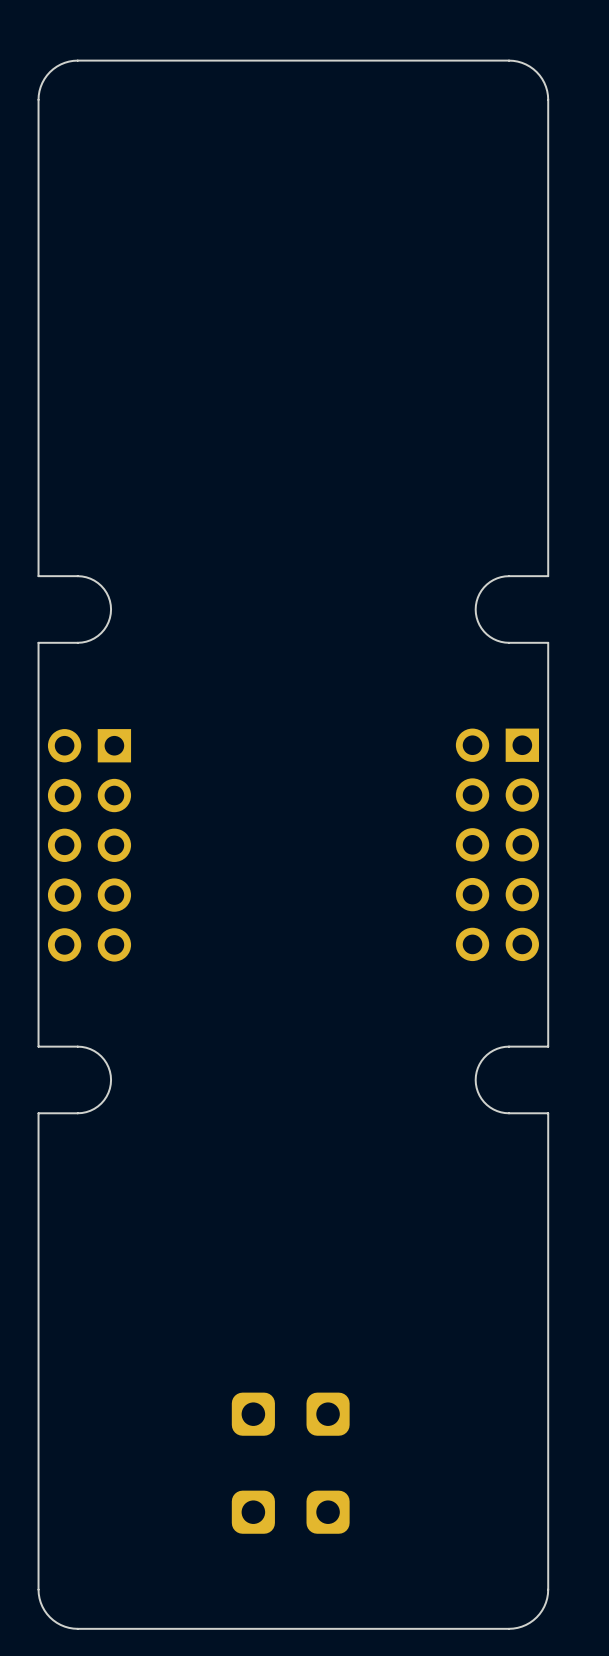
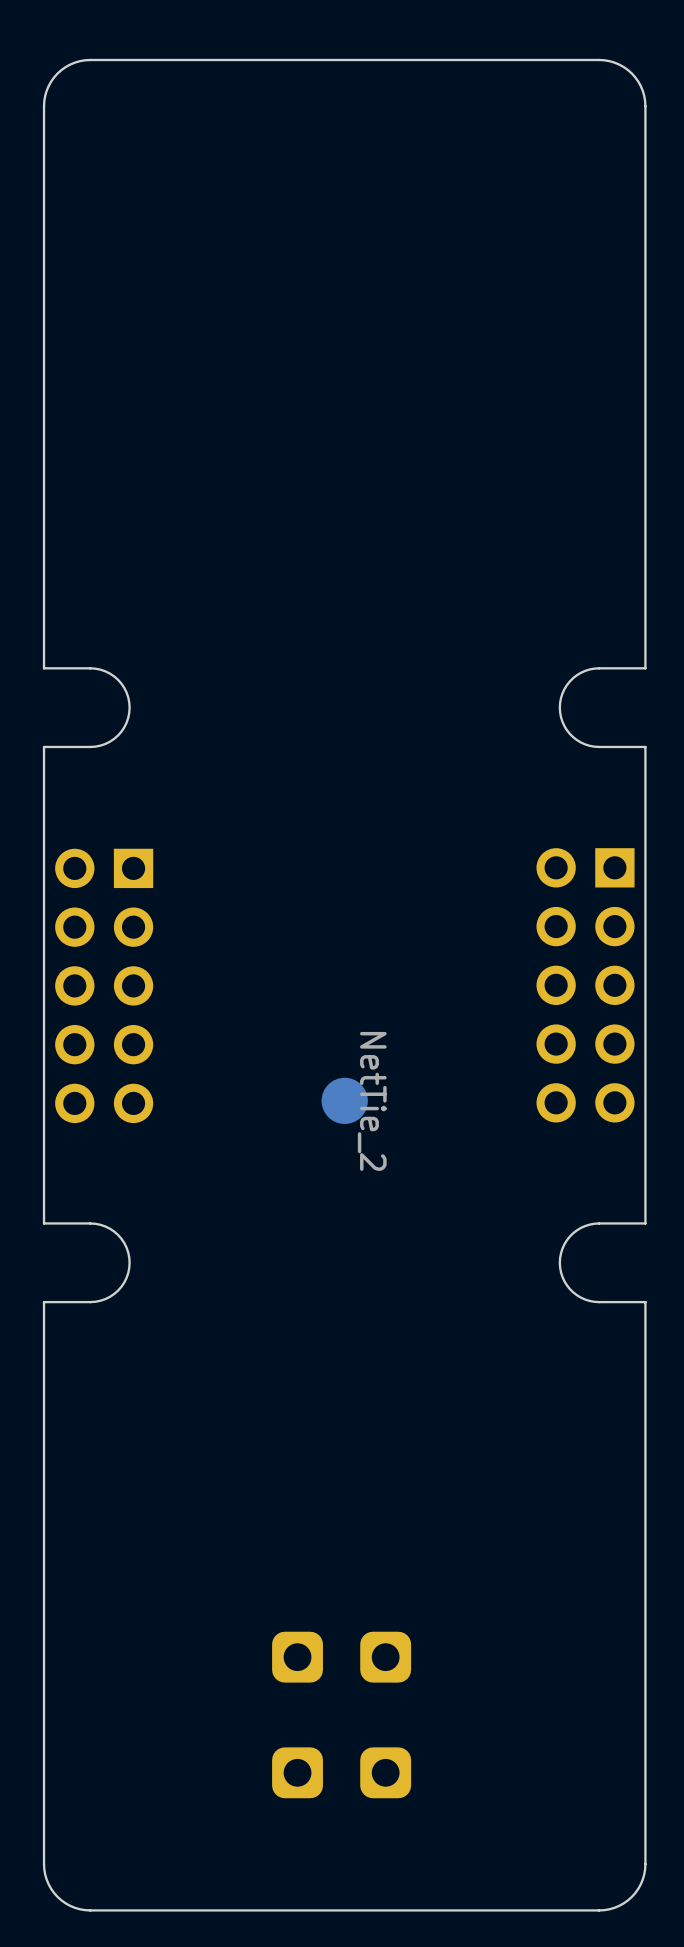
part: none -> NetTie_2 (344, 1100)

